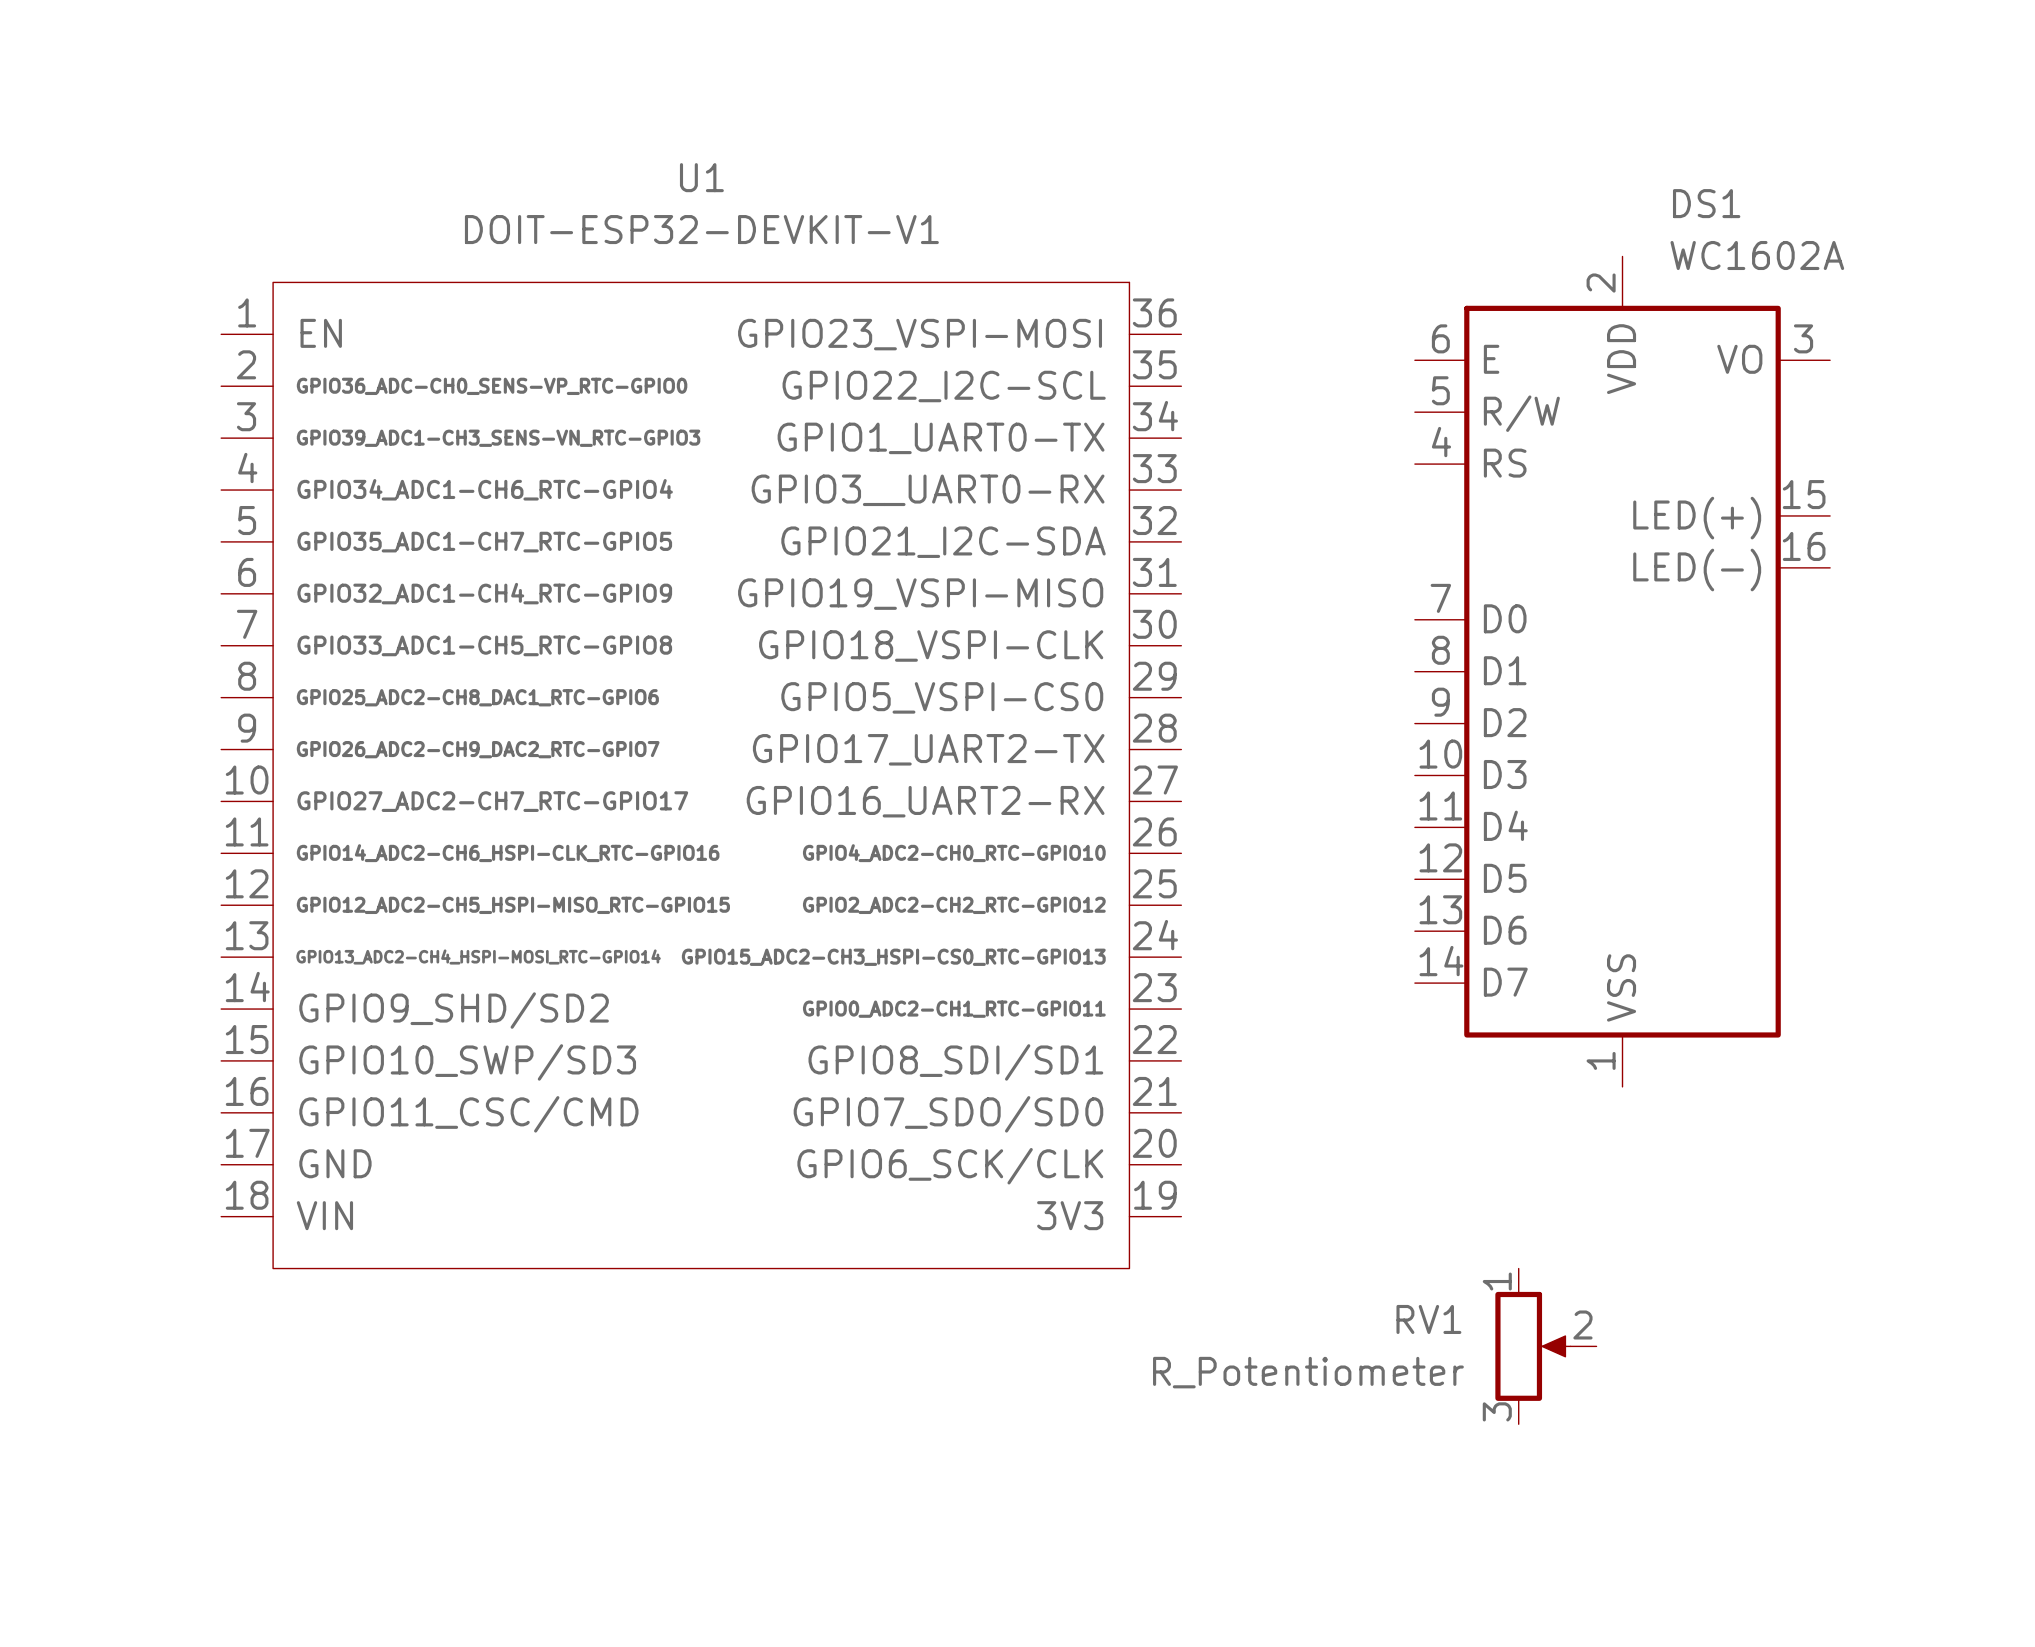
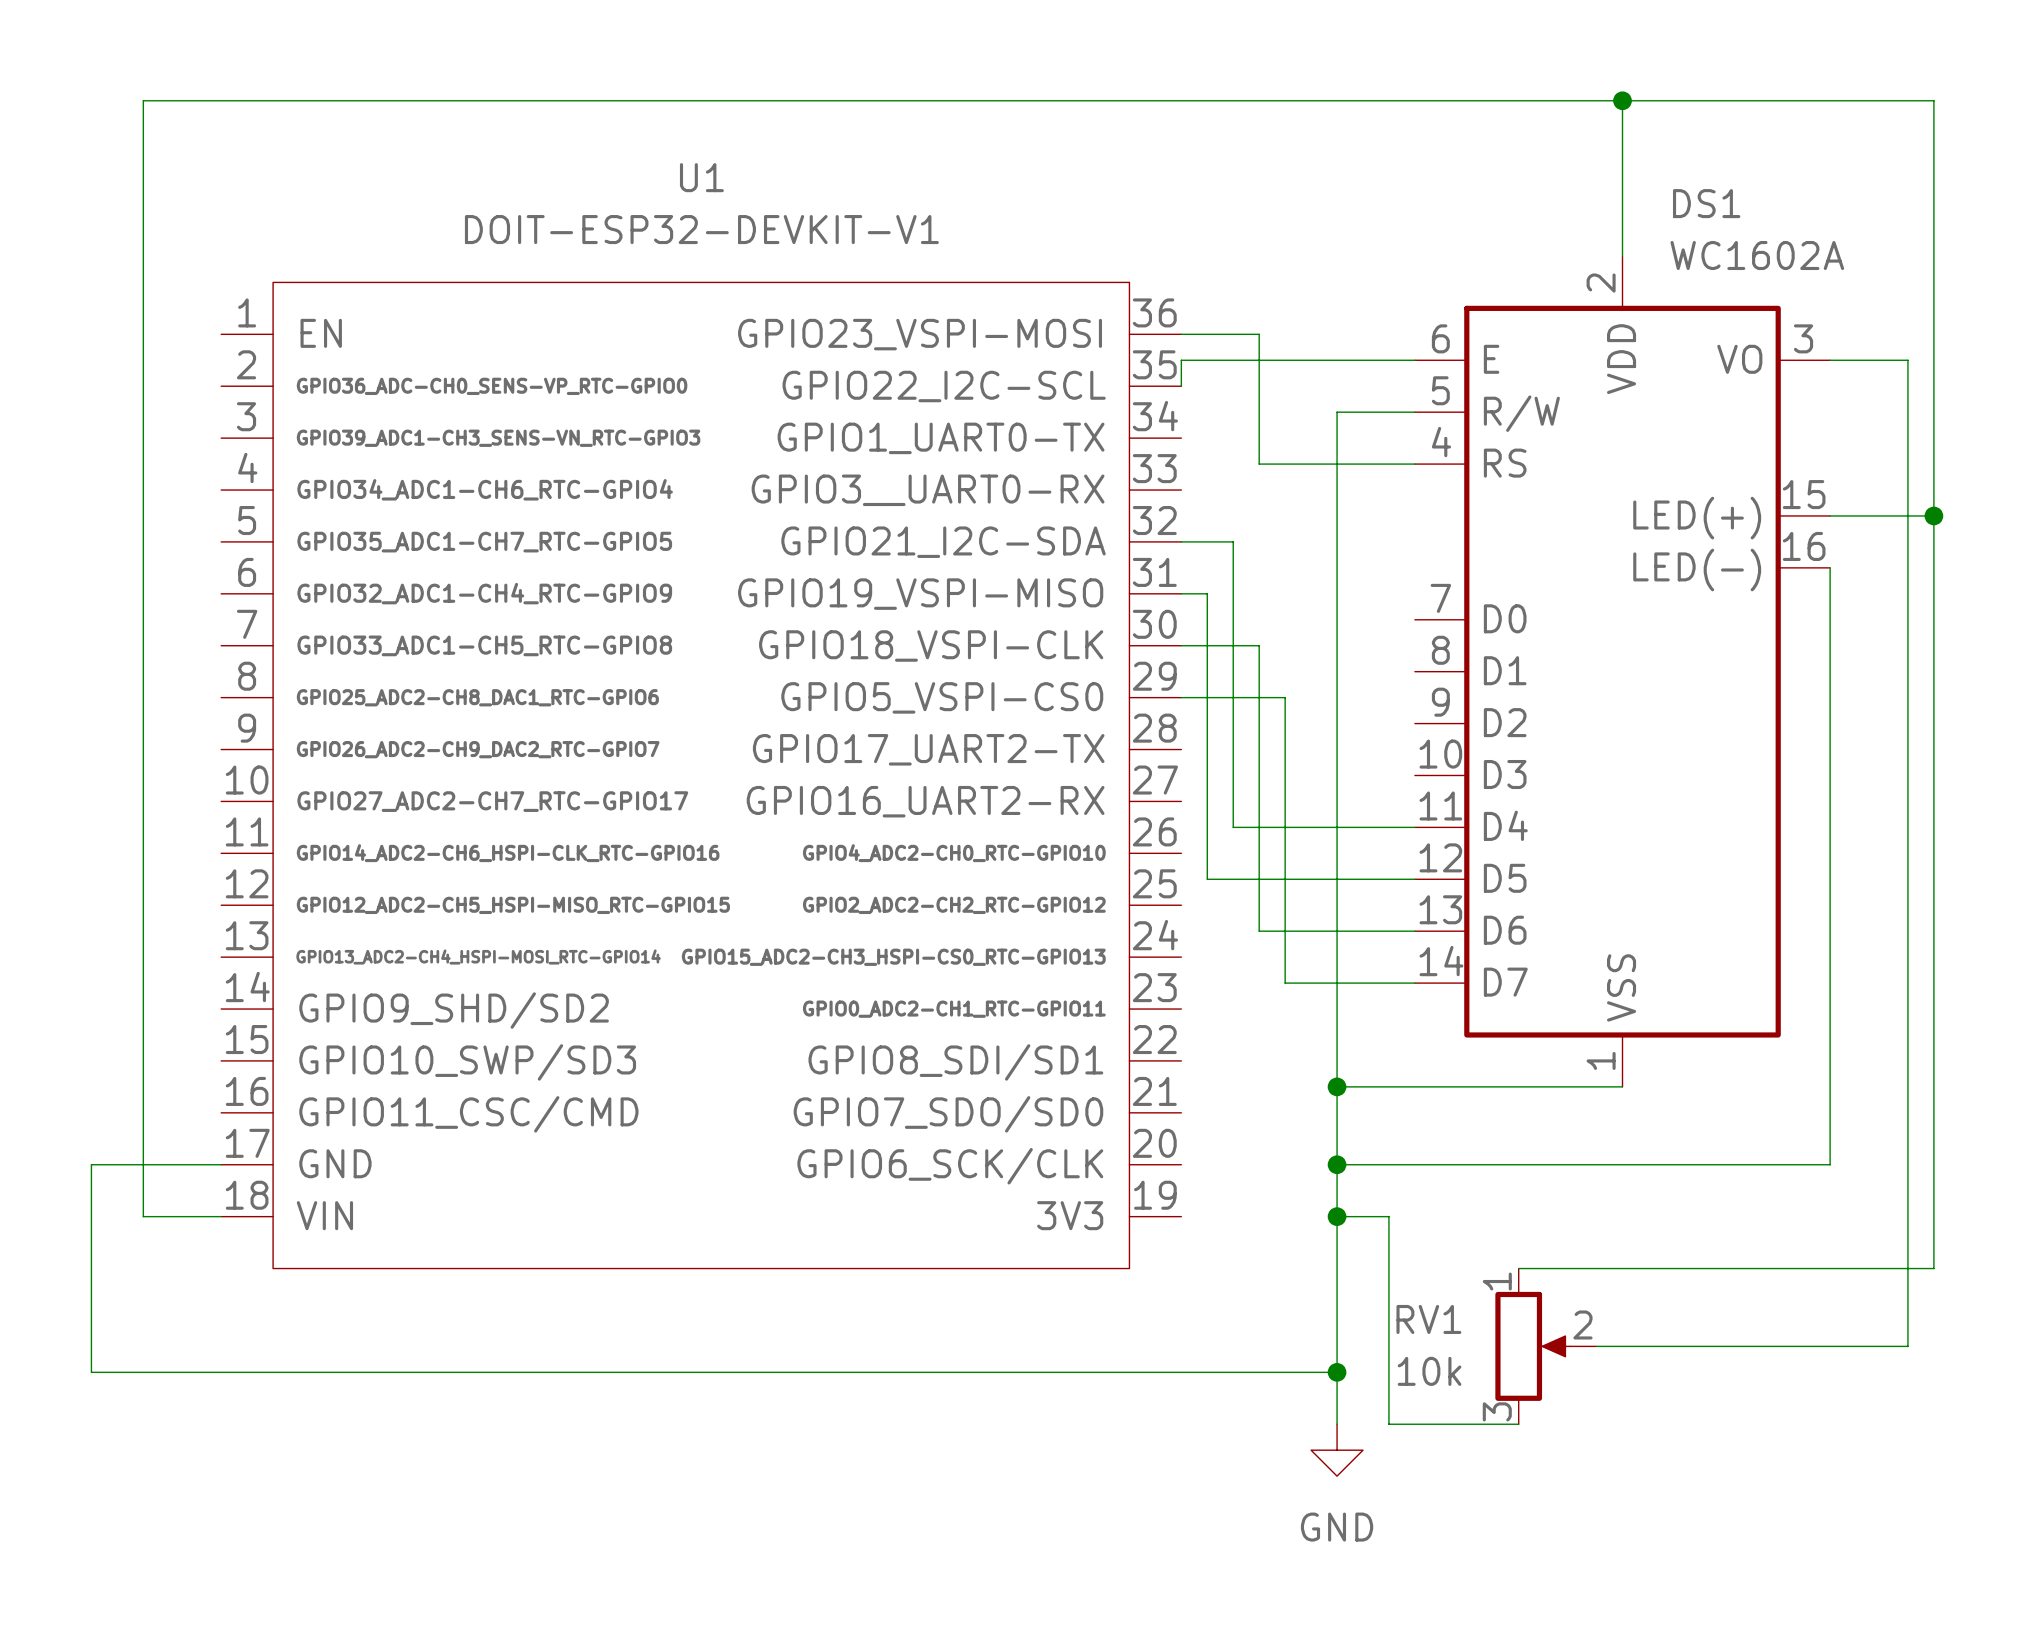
wire: none -> (1622, 100) (1622, 256)
junction: none -> (1622, 100)
wire: none -> (1181, 334) (1259, 334) (1259, 464) (1414, 464)
wire: none -> (1414, 360) (1181, 360) (1181, 386)
wire: none -> (1830, 360) (1907, 360) (1907, 1346) (1596, 1346)
wire: none -> (1414, 412) (1337, 412) (1337, 1424)
wire: none -> (1830, 515) (1933, 515)
junction: none -> (1933, 515)
wire: none -> (1181, 541) (1233, 541) (1233, 827) (1414, 827)
wire: none -> (1830, 567) (1830, 1164) (1337, 1164)
wire: none -> (1181, 593) (1207, 593) (1207, 879) (1414, 879)
wire: none -> (1181, 645) (1259, 645) (1259, 931) (1414, 931)
wire: none -> (1181, 697) (1285, 697) (1285, 983) (1414, 983)
wire: none -> (1337, 1086) (1622, 1086)
junction: none -> (1337, 1086)
wire: none -> (221, 1164) (91, 1164) (91, 1372) (1337, 1372)
junction: none -> (1337, 1164)
wire: none -> (221, 1216) (143, 1216) (143, 100) (1933, 100) (1933, 1268) (1518, 1268)
wire: none -> (1337, 1216) (1388, 1216) (1388, 1424) (1518, 1424)
junction: none -> (1337, 1216)
RV1 value: R_Potentiometer (1308, 1372) -> 10k (1429, 1371)
junction: none -> (1337, 1372)
power symbol: none -> GND (1337, 1450)

